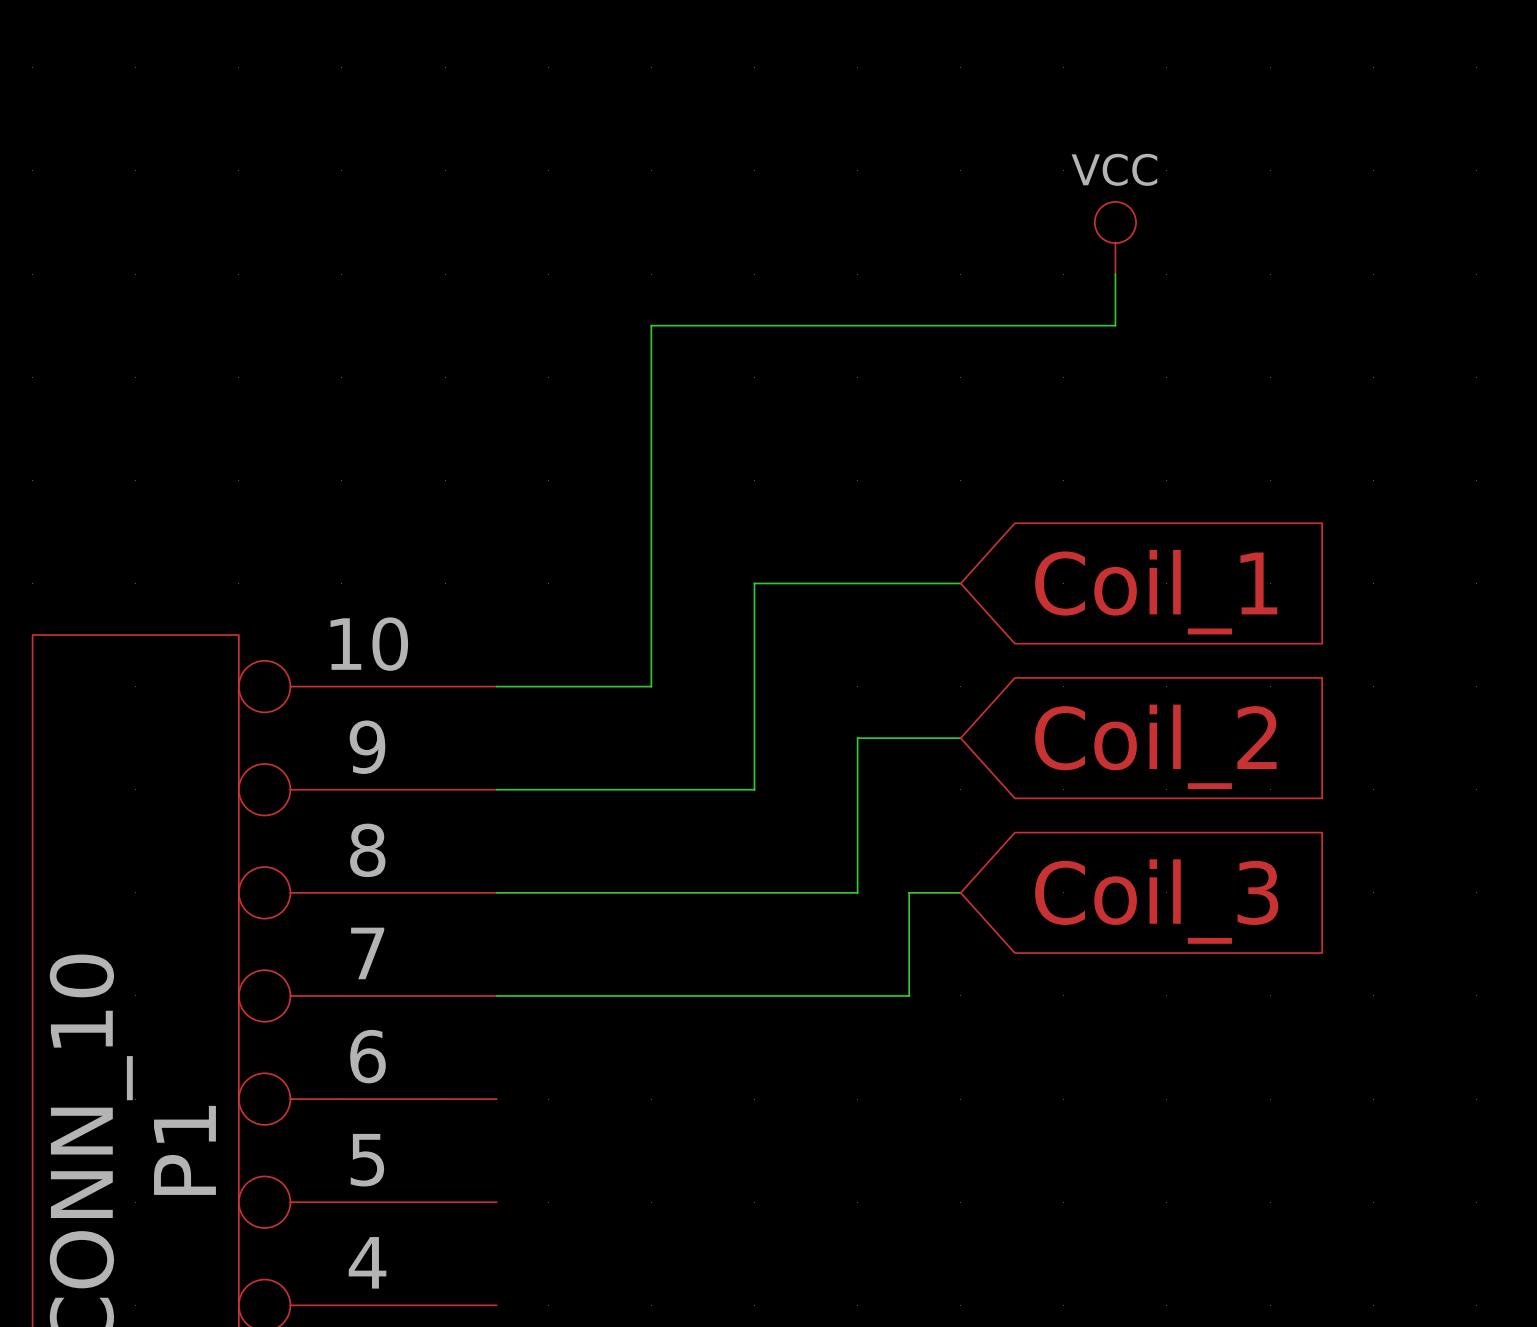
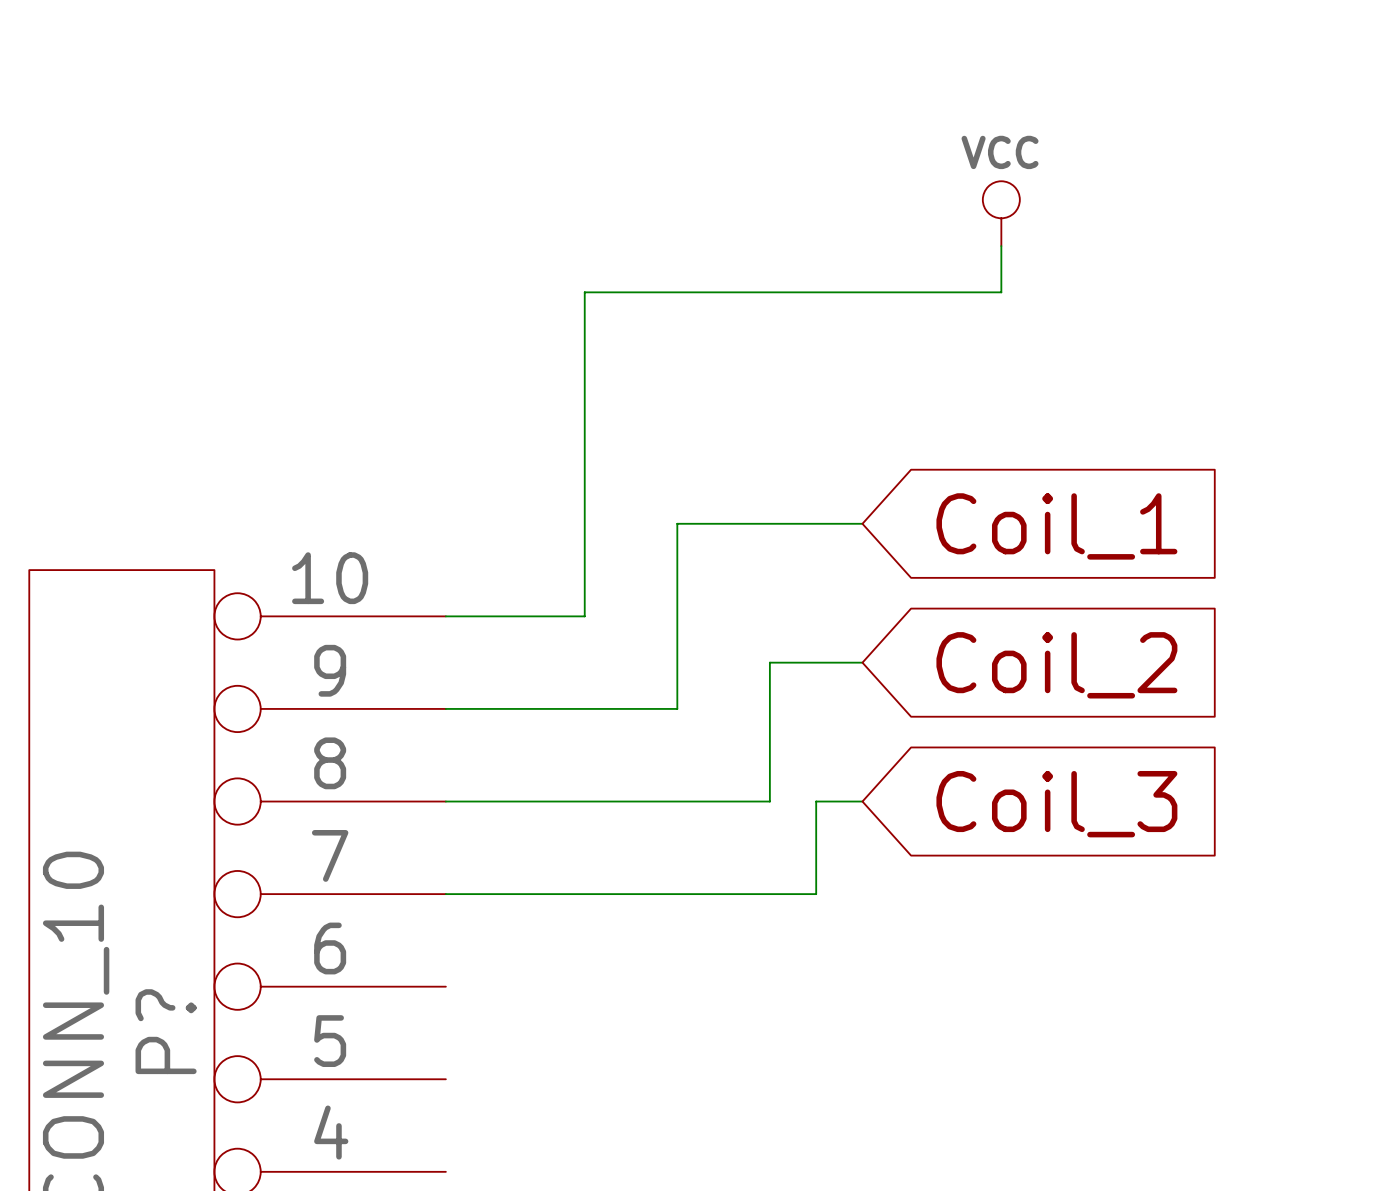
P1 name: P1 (184, 1150) -> P? (166, 1031)

